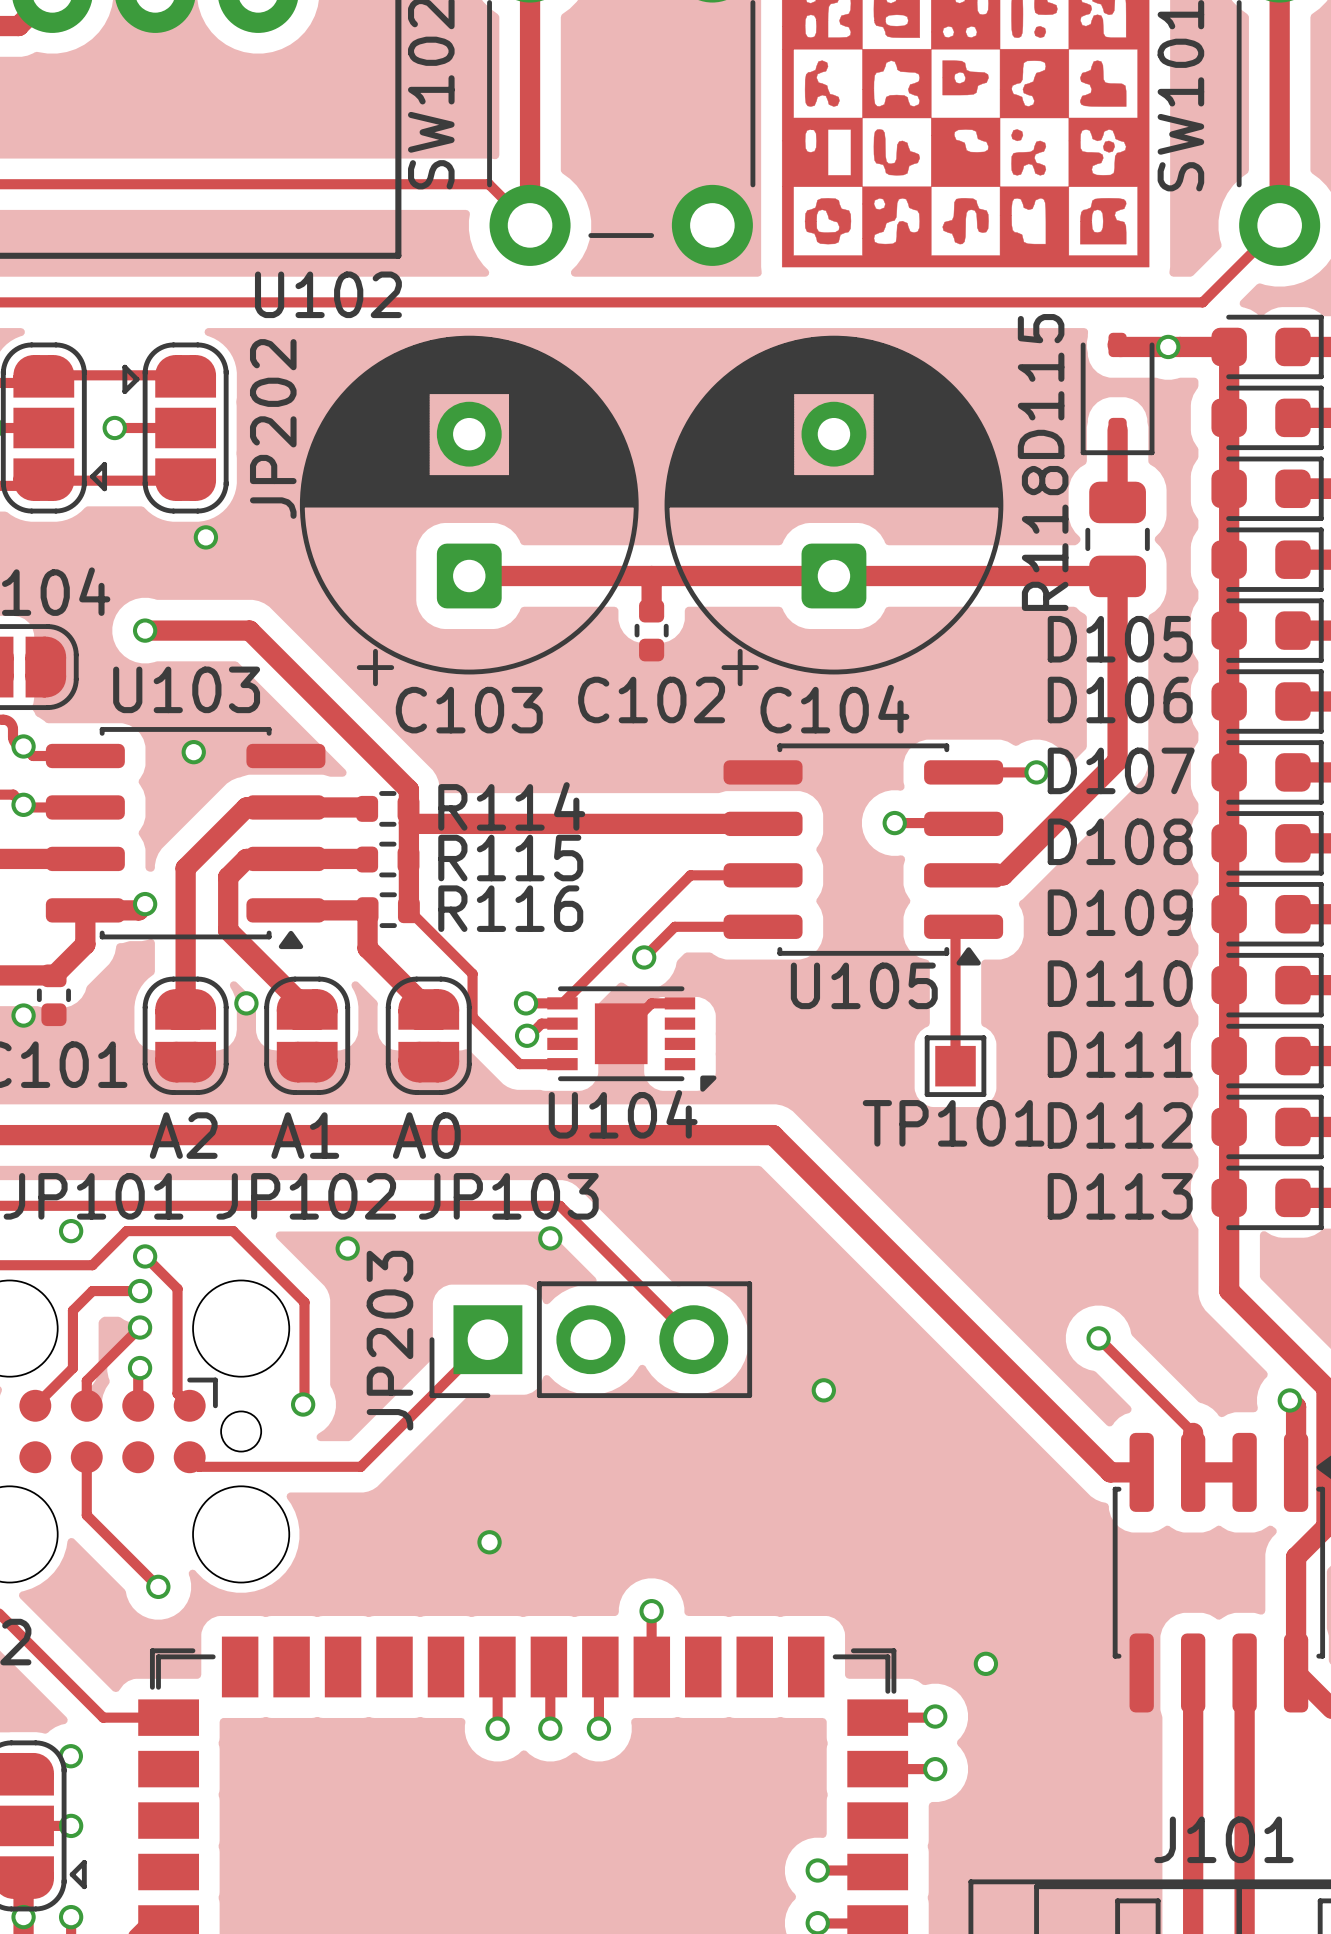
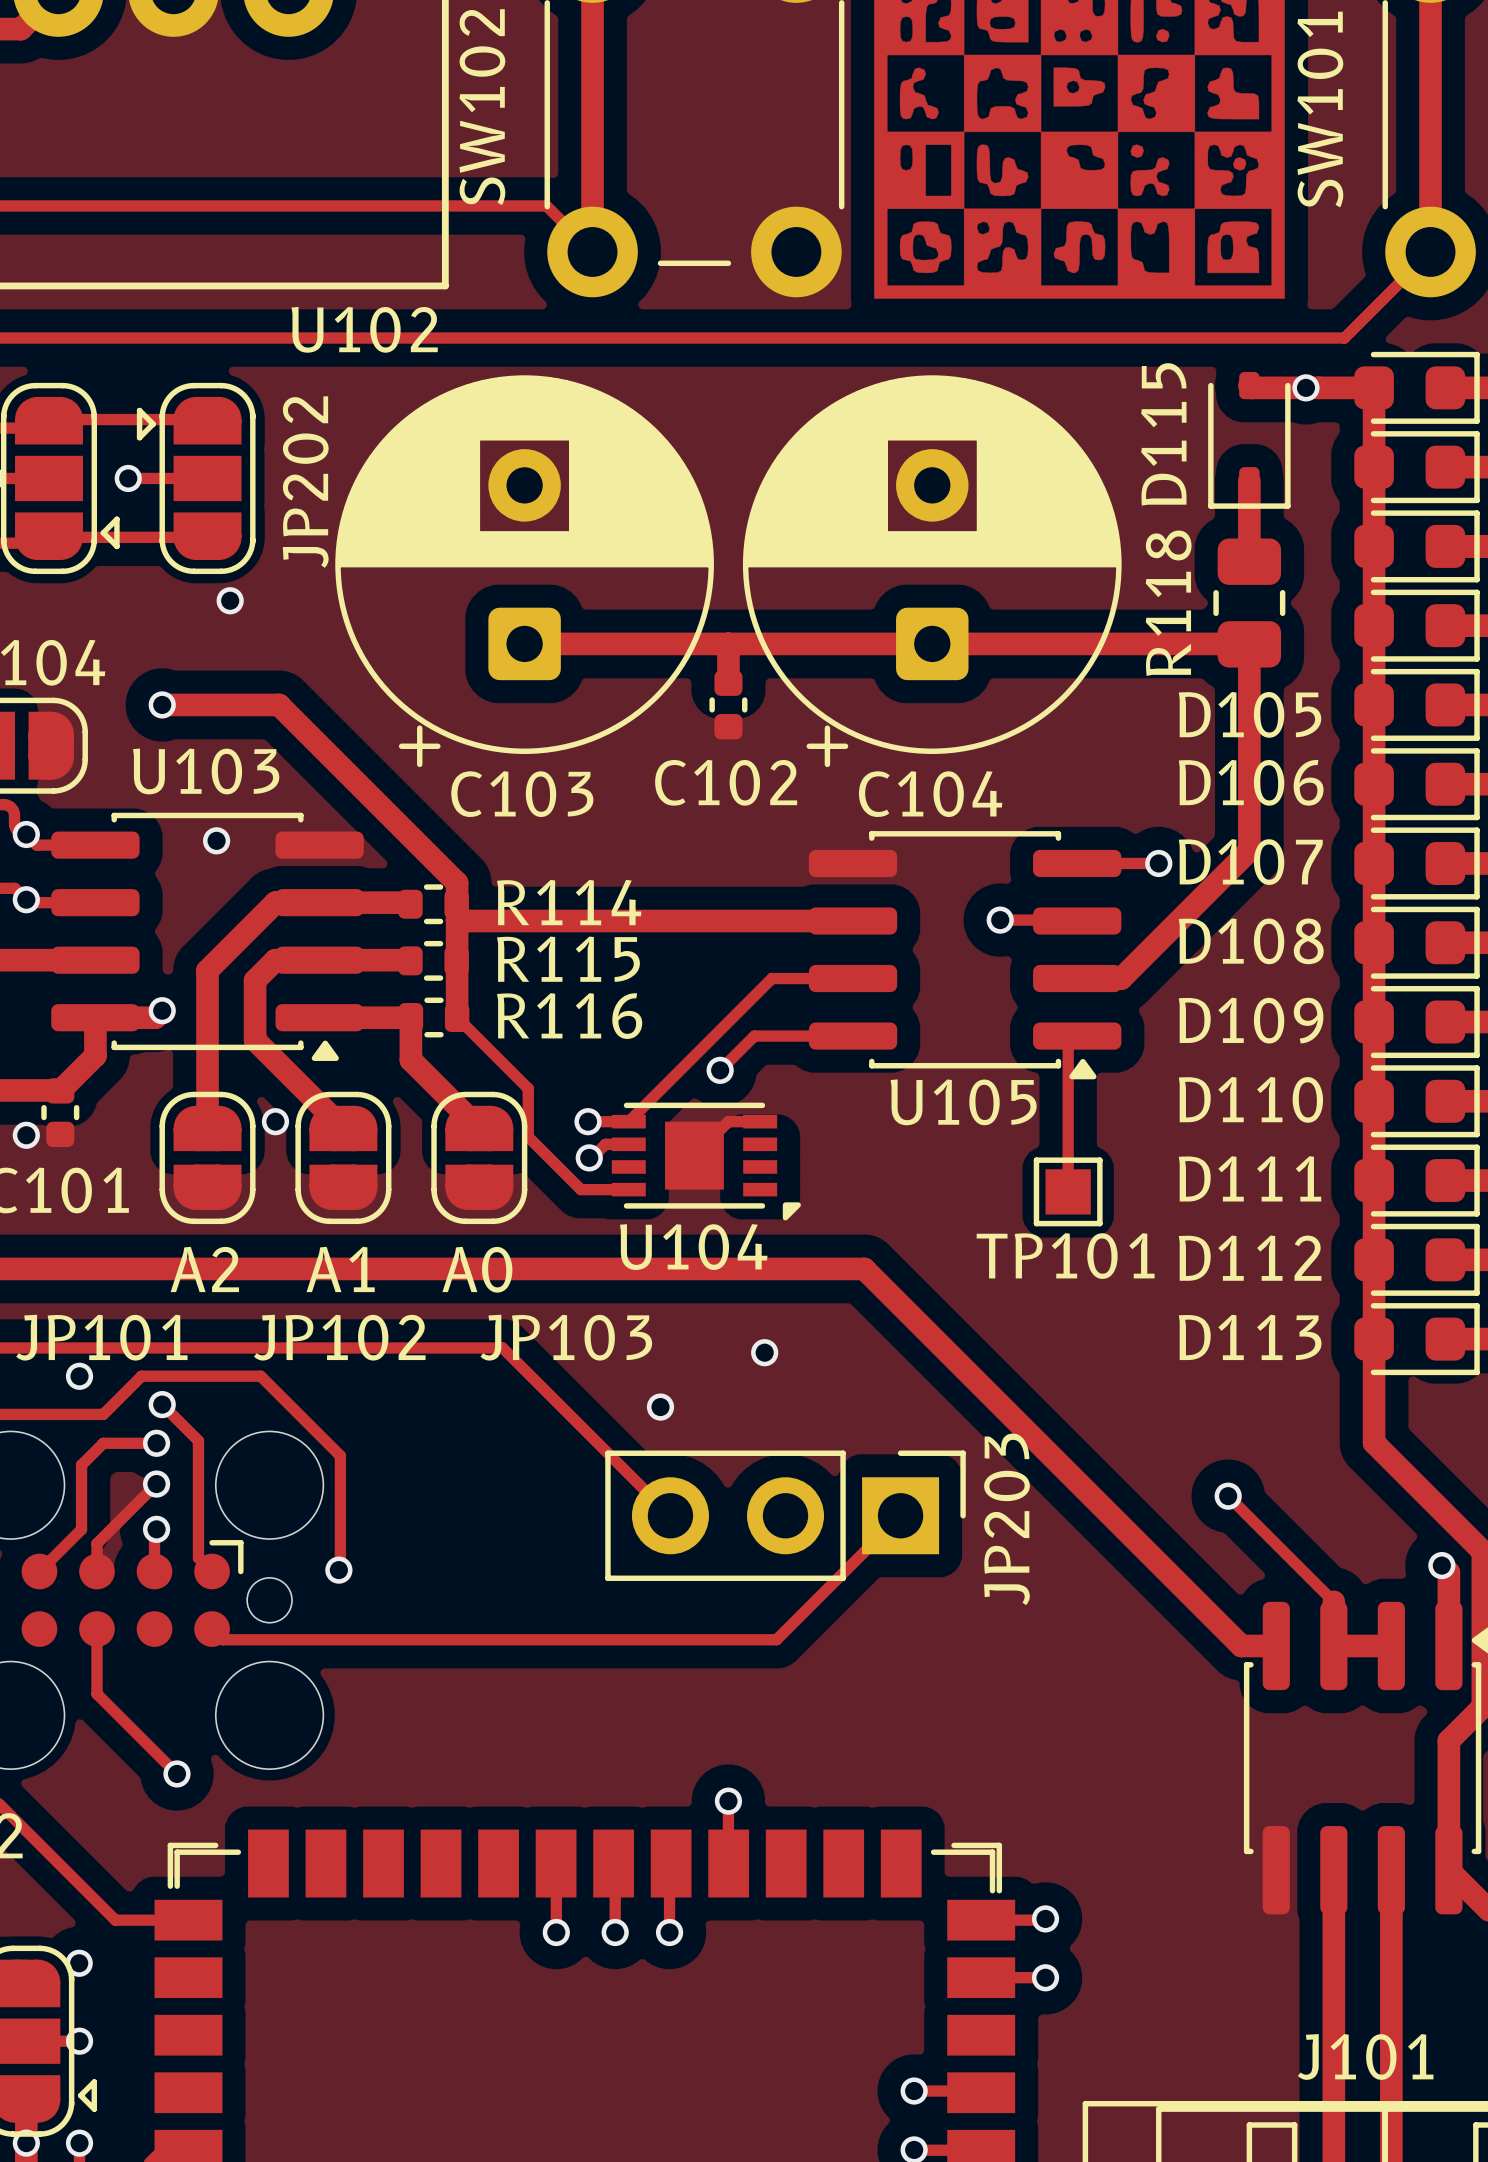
track: (449, 1205) (559, 1205) (693, 1339) -> (502, 1347) (670, 1515)
via: none -> (764, 1352)
via position: (550, 1238) -> (660, 1407)
via: (347, 1248) -> none
track: (487, 1339) (360, 1466) -> (900, 1515) (776, 1639) (403, 1639)
JP203 rotation: 0° (590, 1339) -> 180° (785, 1515)
via: (823, 1390) -> none
via: (489, 1542) -> none
via: (985, 1663) -> none

